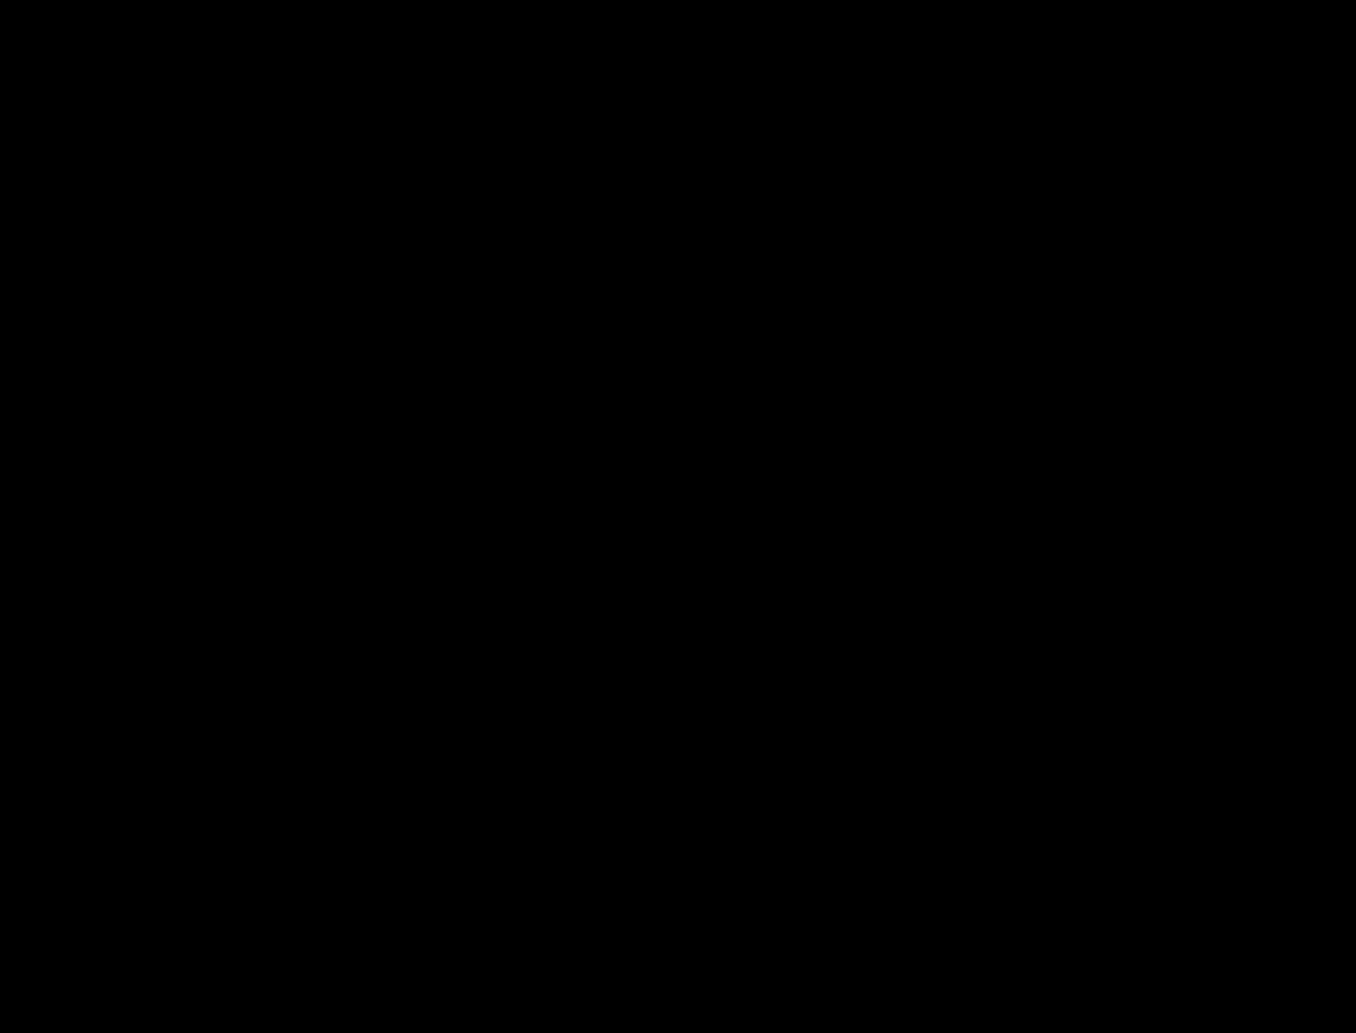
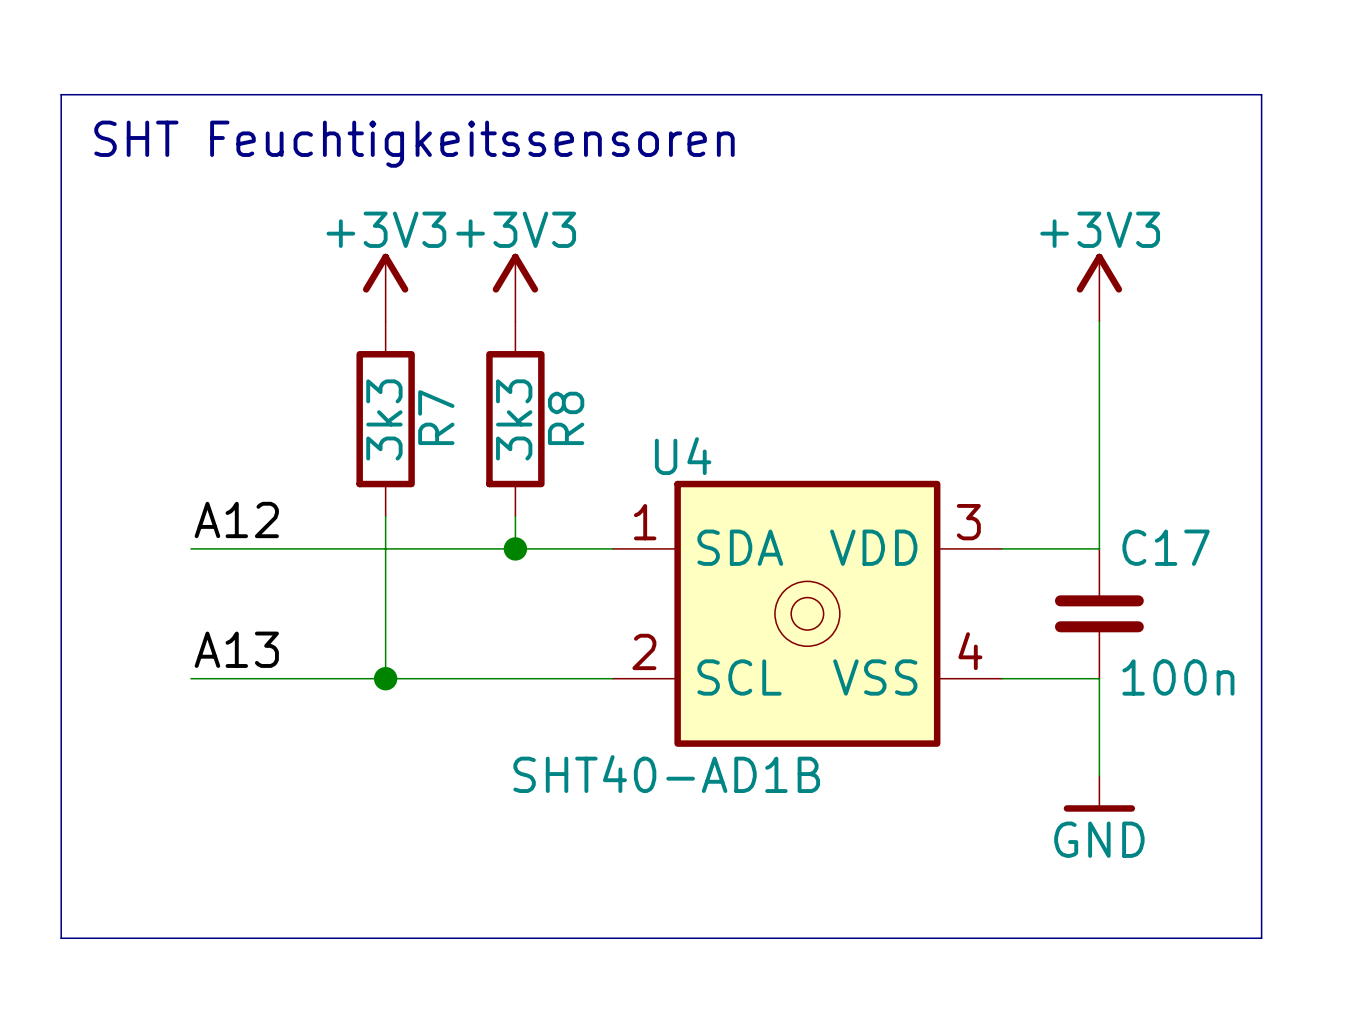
line: none -> (61, 94) (1261, 94) (1261, 938) (61, 938) (61, 94)
text: none -> SHT Feuchtigkeitssensoren (414, 144)
power symbol: none -> +3V3 (385, 287)
power symbol: none -> +3V3 (515, 287)
power symbol: none -> +3V3 (1099, 287)
wire: none -> (1099, 321) (1099, 548) (1002, 548)
R7: none -> 3k3 (385, 419)
R8: none -> 3k3 (515, 419)
wire: none -> (385, 516) (385, 678)
wire: none -> (515, 516) (515, 548)
label: none -> A12 (236, 519)
wire: none -> (190, 548) (612, 548)
junction: none -> (515, 548)
U4: none -> SHT40-AD1B (807, 613)
C17: none -> 100n (1099, 613)
label: none -> A13 (236, 649)
wire: none -> (190, 678) (612, 678)
junction: none -> (385, 678)
wire: none -> (1002, 678) (1099, 678) (1099, 776)
power symbol: none -> GND (1099, 793)

